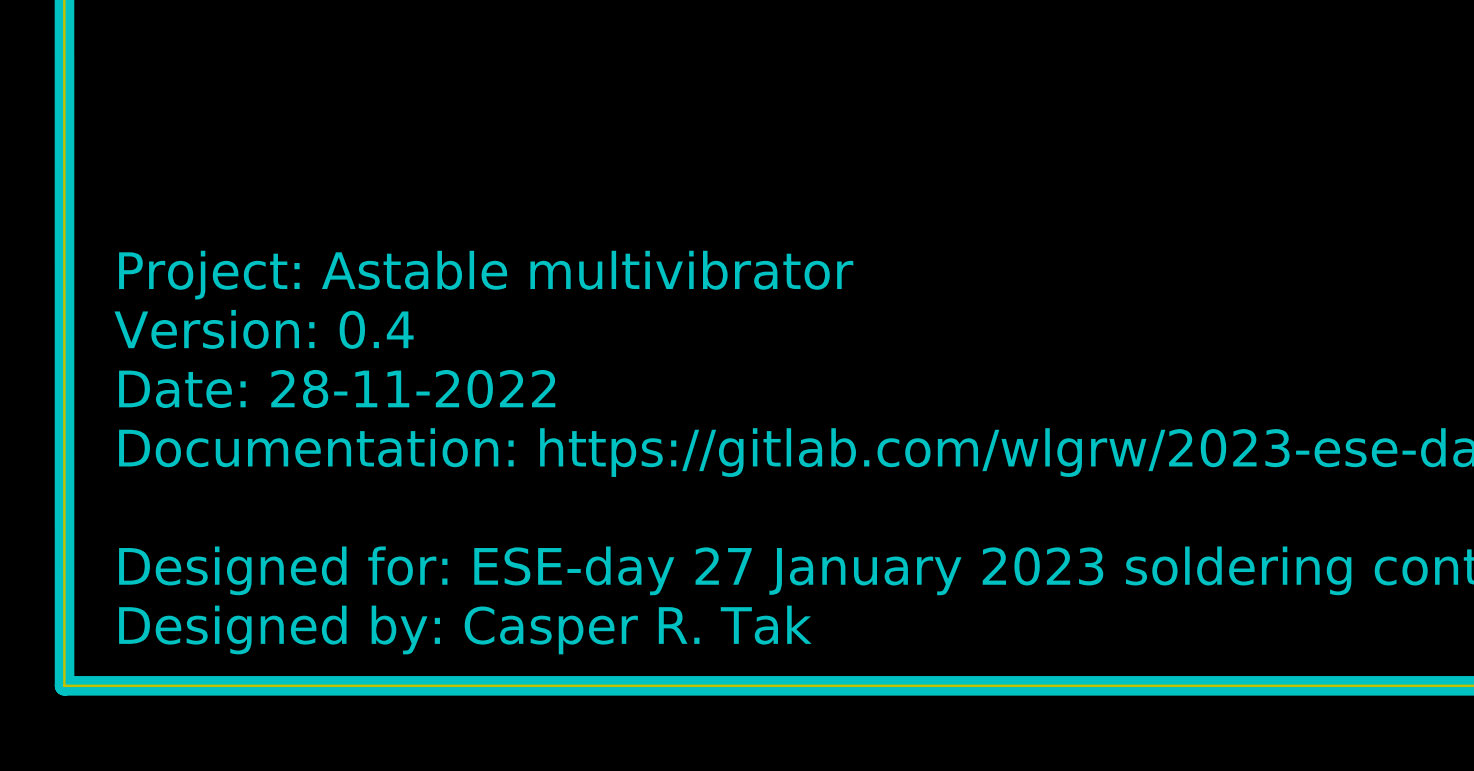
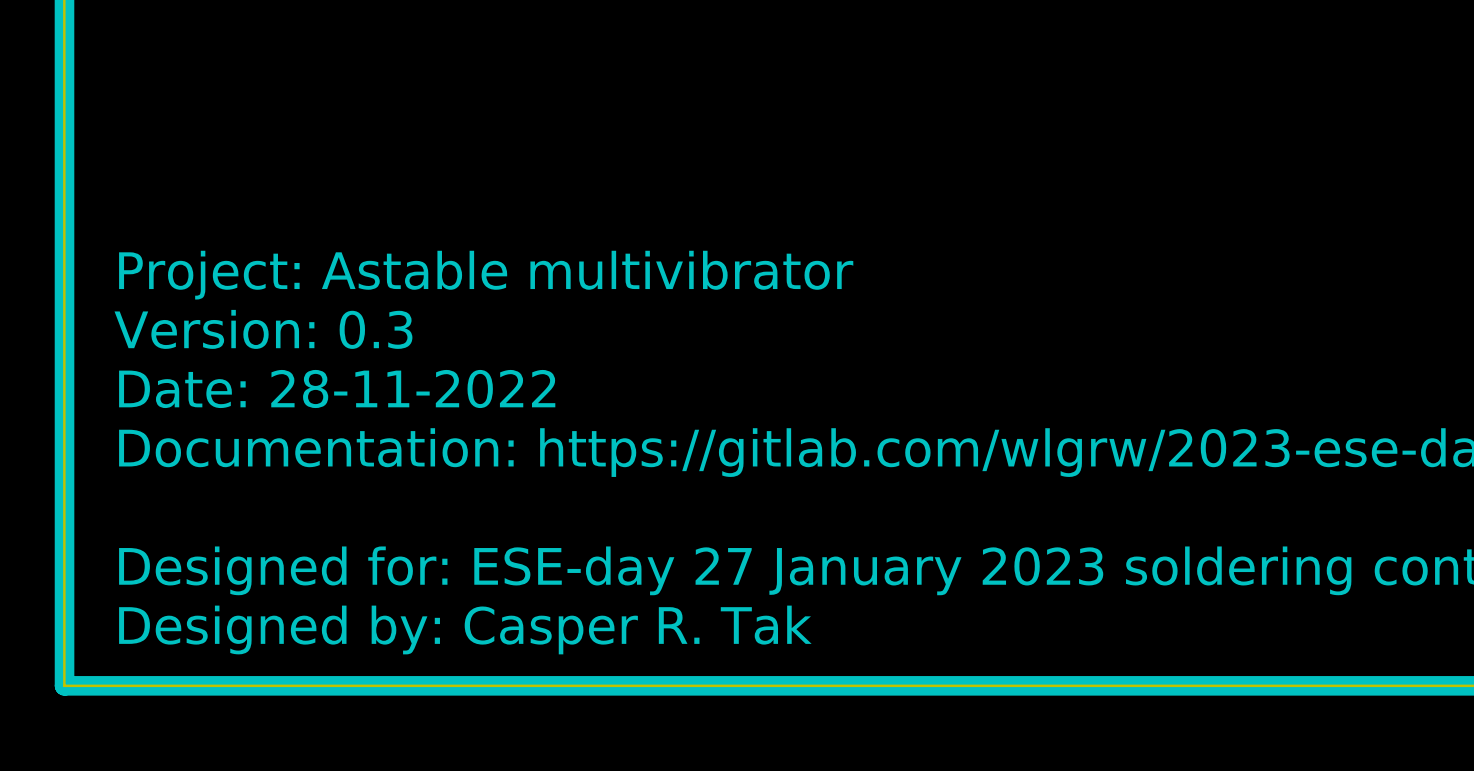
text: Version: 0.4 (264, 329) -> Version: 0.3 (263, 329)

